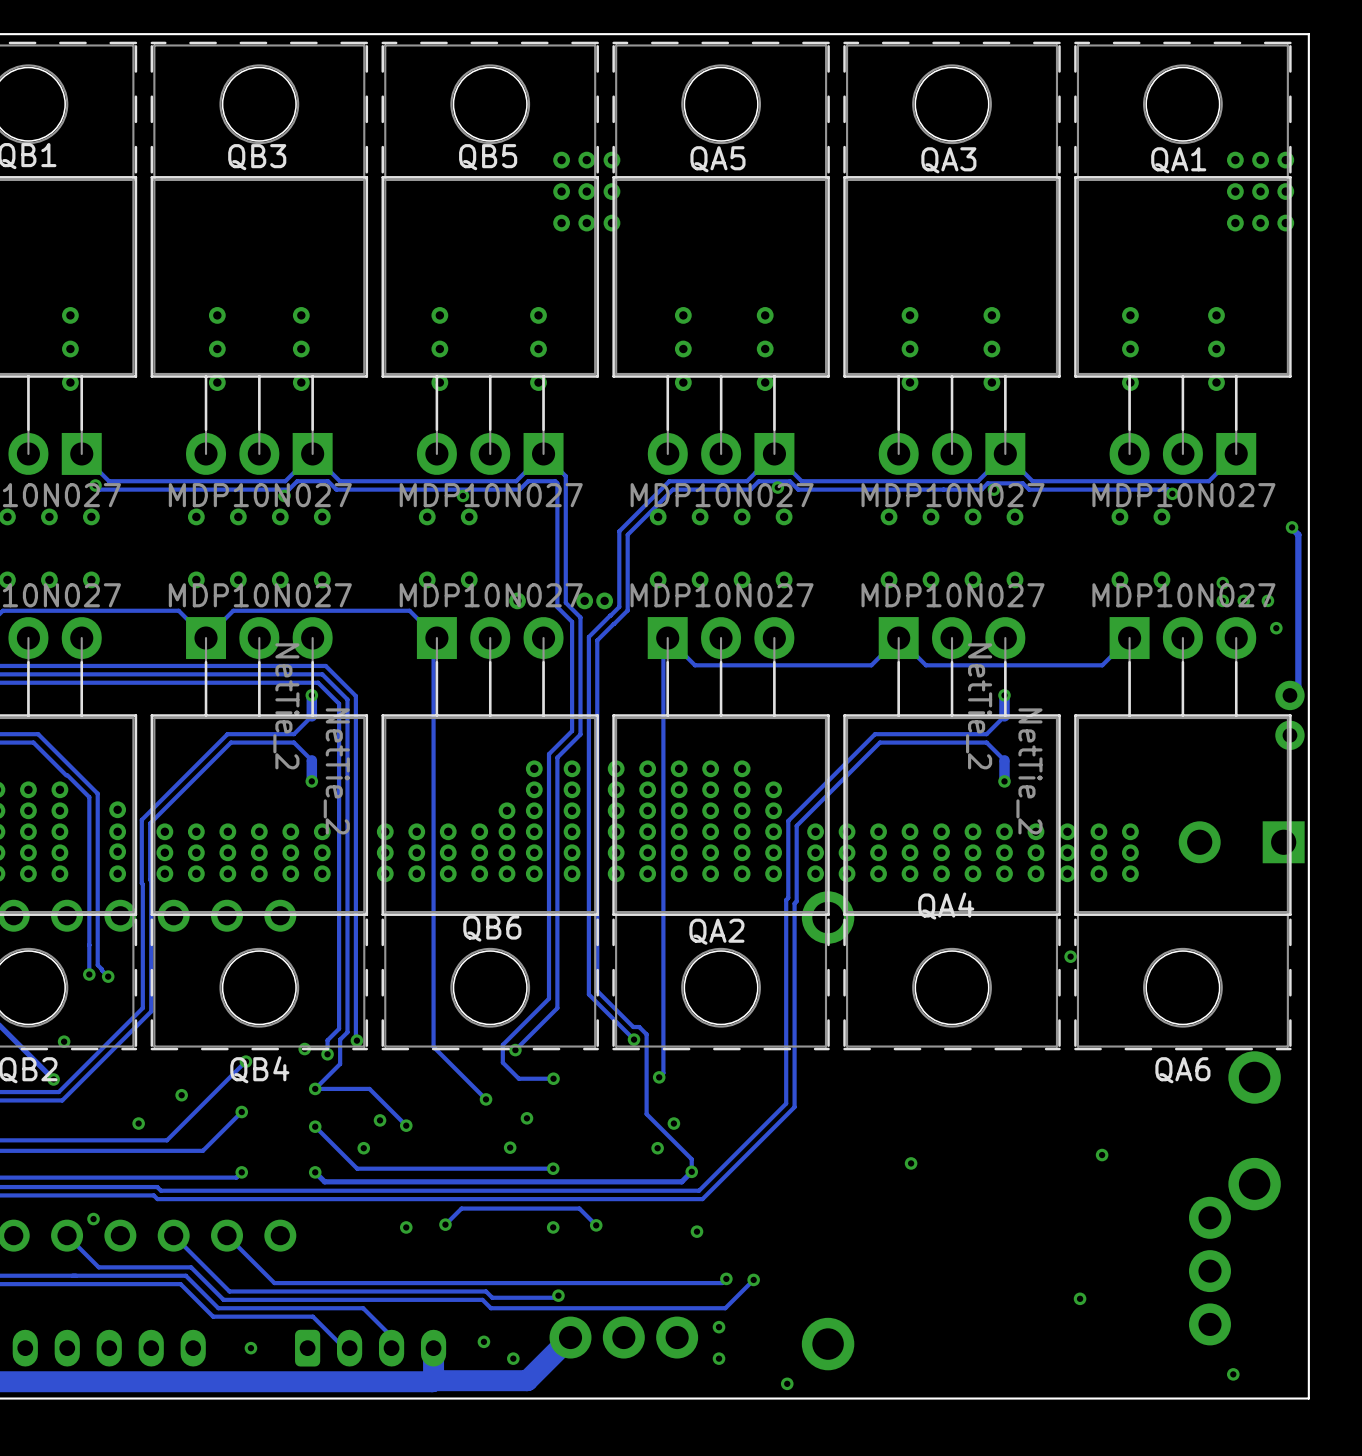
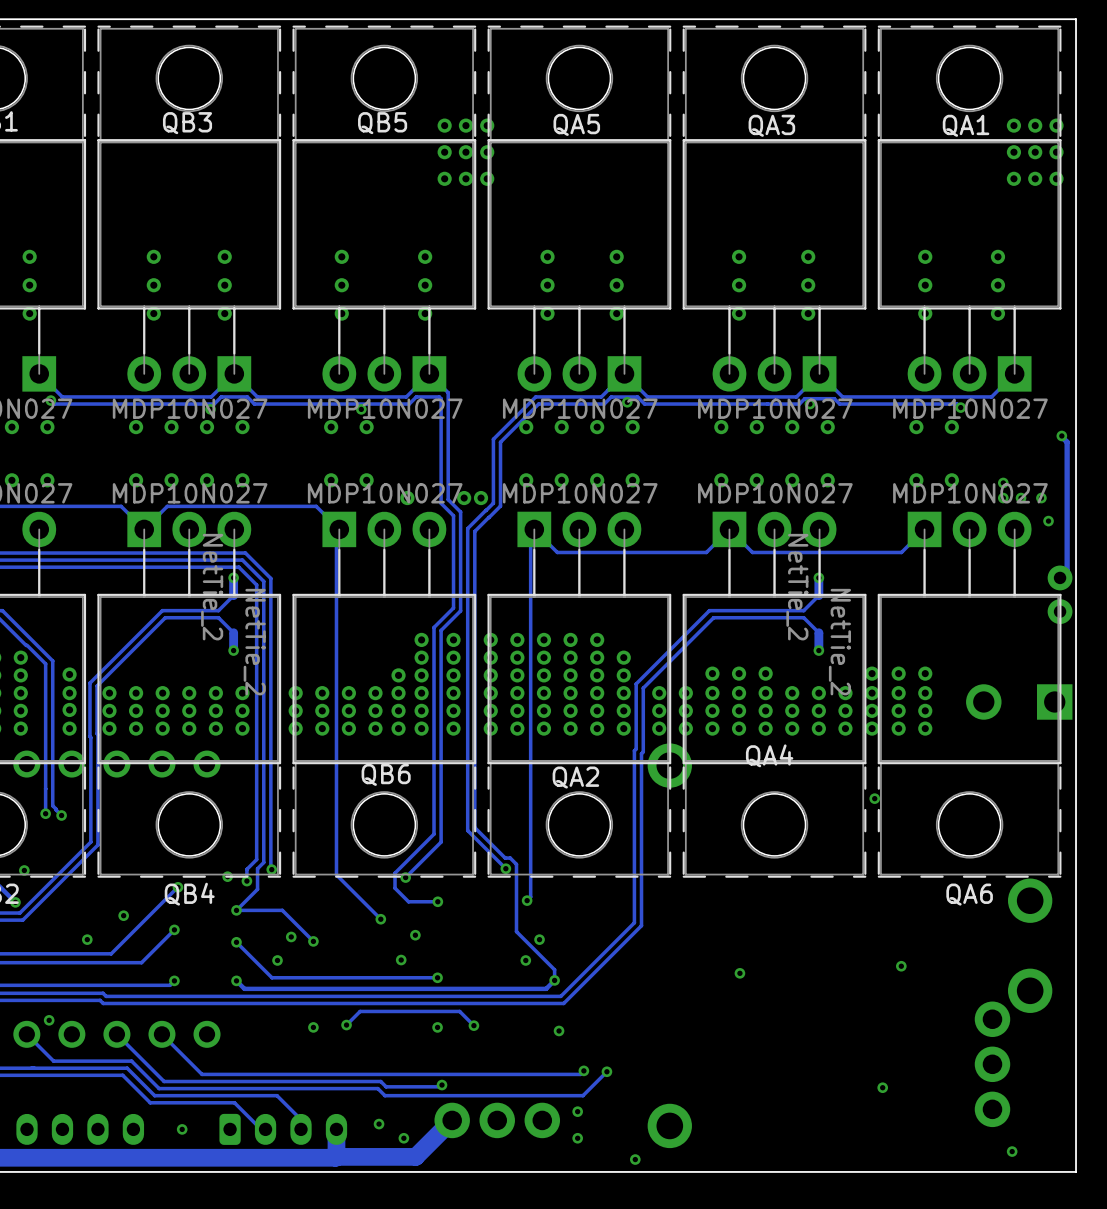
via: none -> (712, 673)
via: none -> (739, 673)
via: none -> (765, 673)
via: none -> (872, 673)
via: none -> (898, 673)
via: none -> (925, 673)

